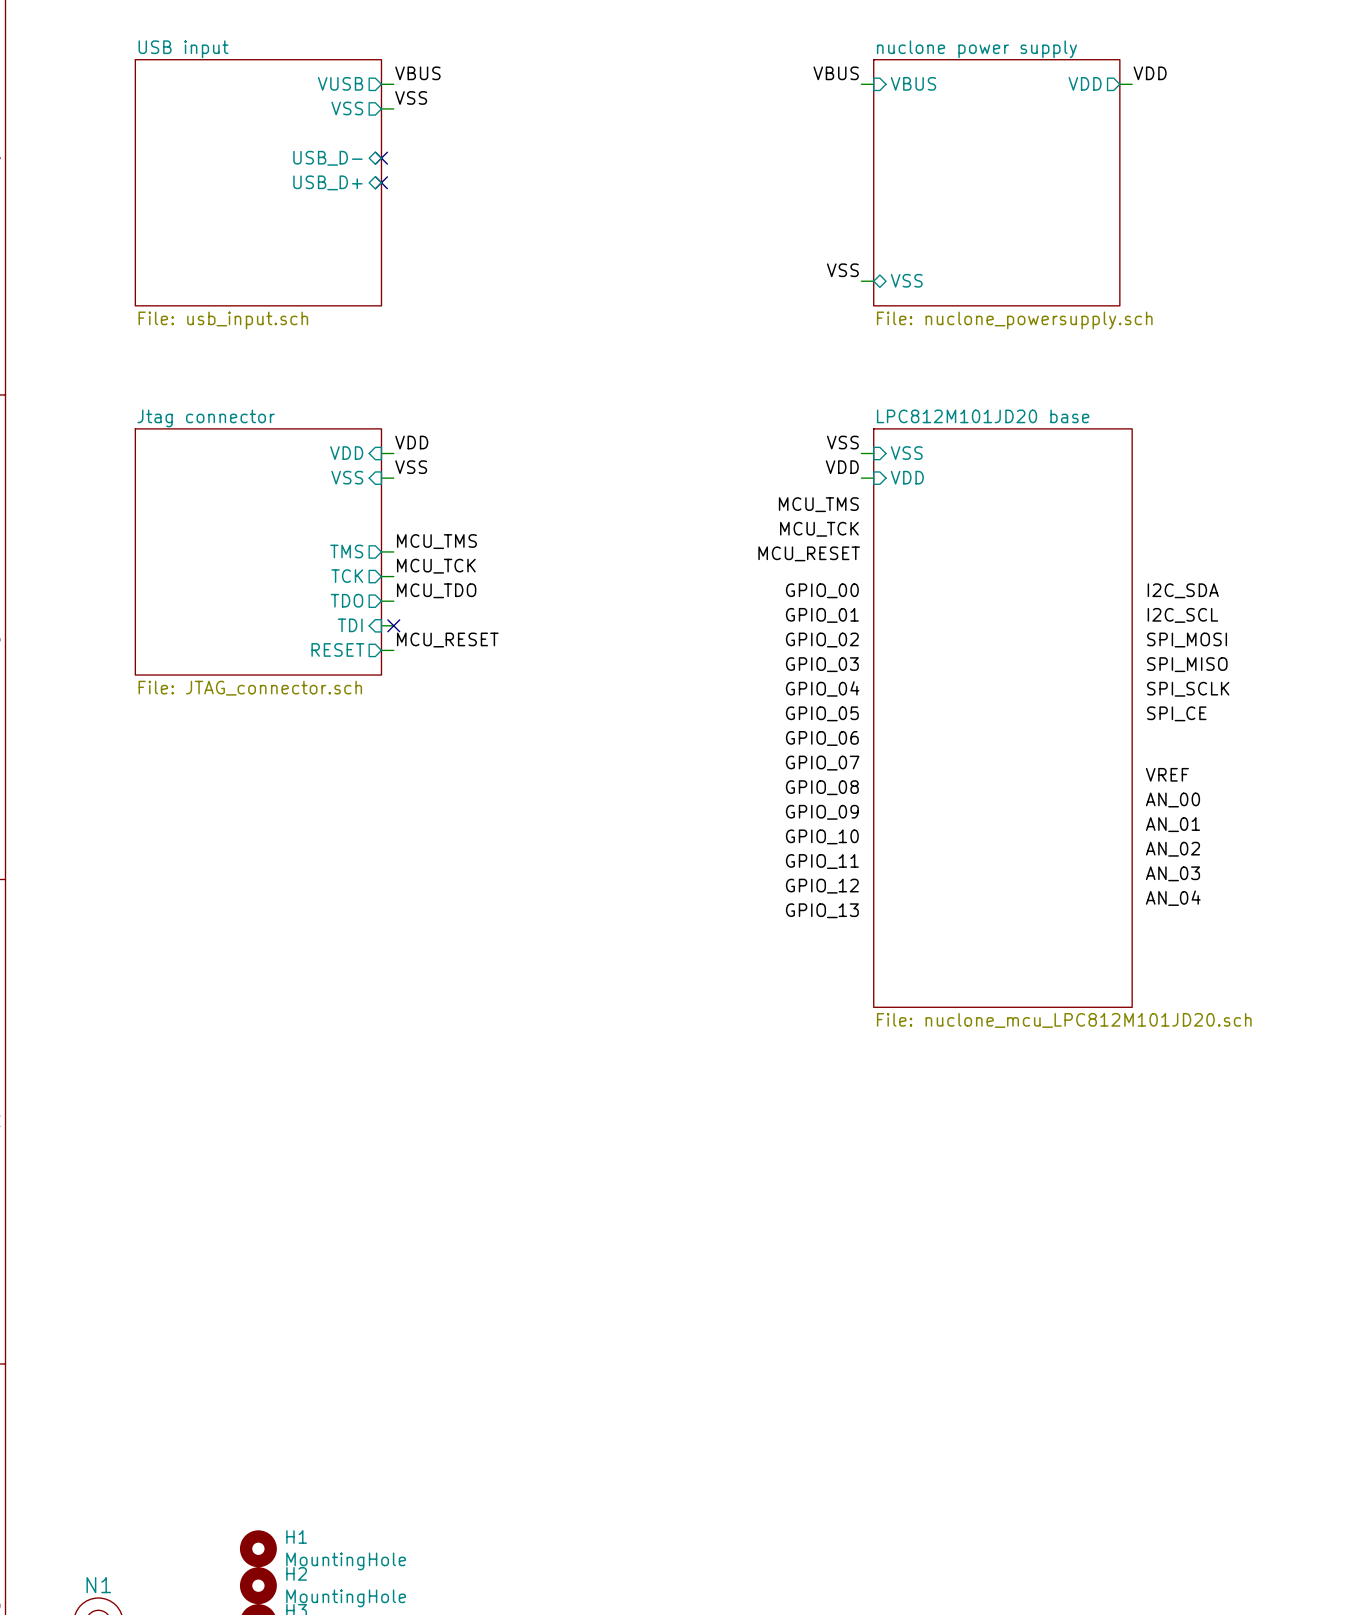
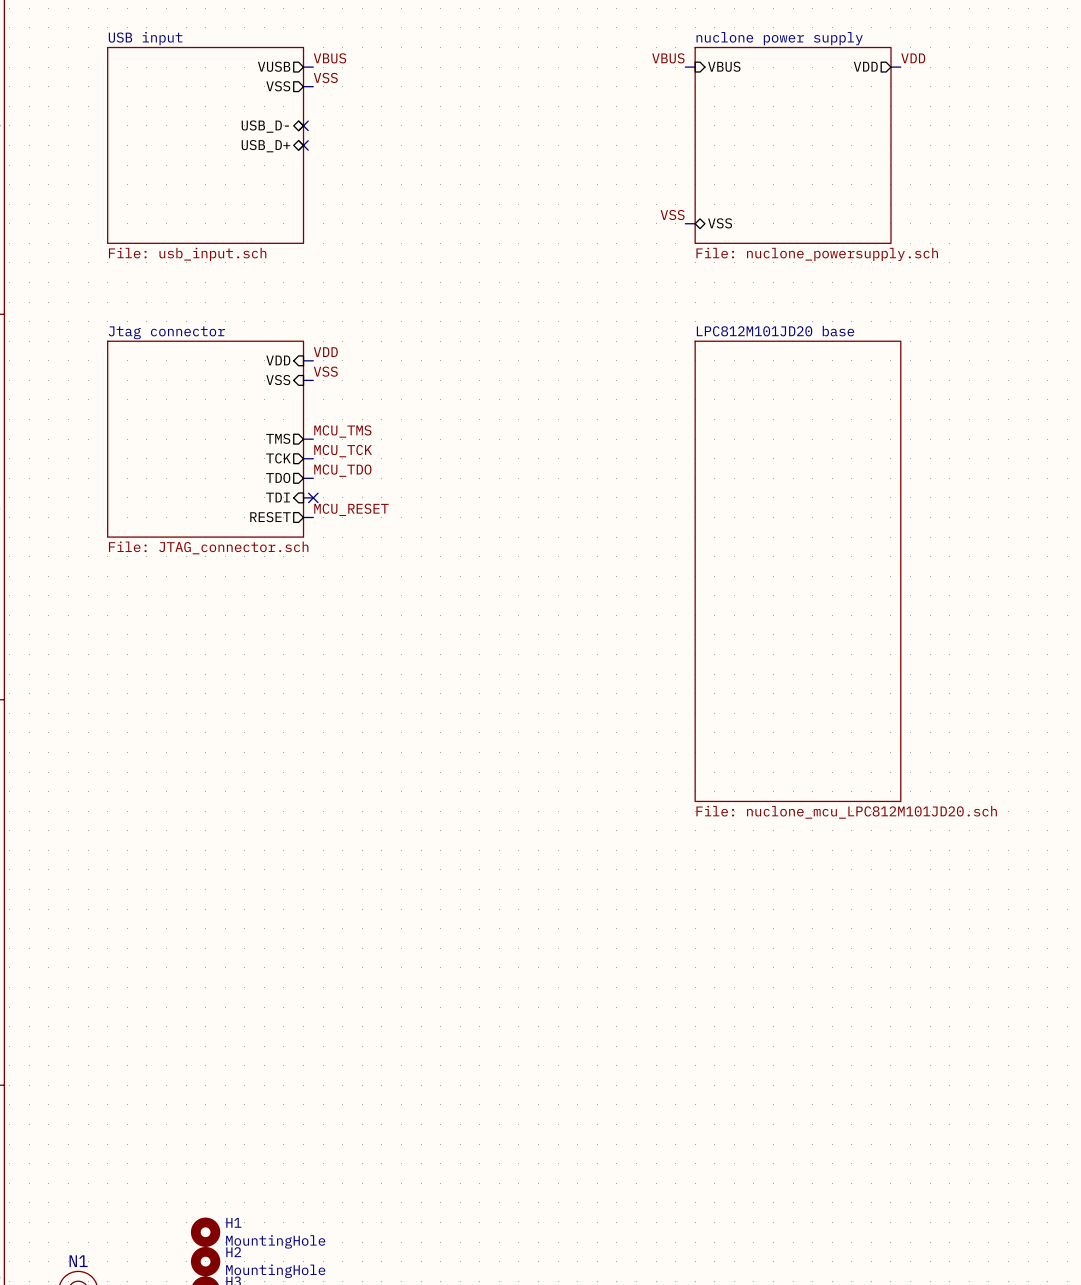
label: VSS (842, 442) -> none
wire: (861, 453) (873, 453) -> none
sheet pin: VSS (906, 453) -> none
label: VDD (842, 467) -> none
sheet pin: VDD (907, 477) -> none
wire: (861, 478) (873, 478) -> none
label: MCU_TMS (818, 504) -> none
label: MCU_TCK (819, 529) -> none
label: MCU_RESET (809, 553) -> none
label: GPIO_00 (822, 590) -> none
label: I2C_SDA (1183, 590) -> none
label: GPIO_01 (822, 615) -> none
label: I2C_SCL (1182, 615) -> none
label: GPIO_02 (822, 640) -> none
label: SPI_MOSI (1187, 640) -> none
label: GPIO_03 (822, 664) -> none
label: SPI_MISO (1187, 664) -> none
label: GPIO_04 (822, 688) -> none
label: SPI_SCLK (1188, 689) -> none
label: GPIO_05 (822, 713) -> none
label: SPI_CE (1176, 713) -> none
label: GPIO_06 (822, 738) -> none
label: GPIO_07 (822, 763) -> none
label: VREF (1167, 774) -> none
label: GPIO_08 (822, 787) -> none
label: AN_00 (1172, 800) -> none
label: GPIO_09 (822, 812) -> none
label: AN_01 (1172, 824) -> none
label: GPIO_10 (822, 836) -> none
label: AN_02 (1172, 849) -> none
label: GPIO_11 (822, 861) -> none
label: AN_03 (1172, 873) -> none
label: GPIO_12 (822, 886) -> none
label: AN_04 (1173, 898) -> none
label: GPIO_13 (822, 910) -> none

